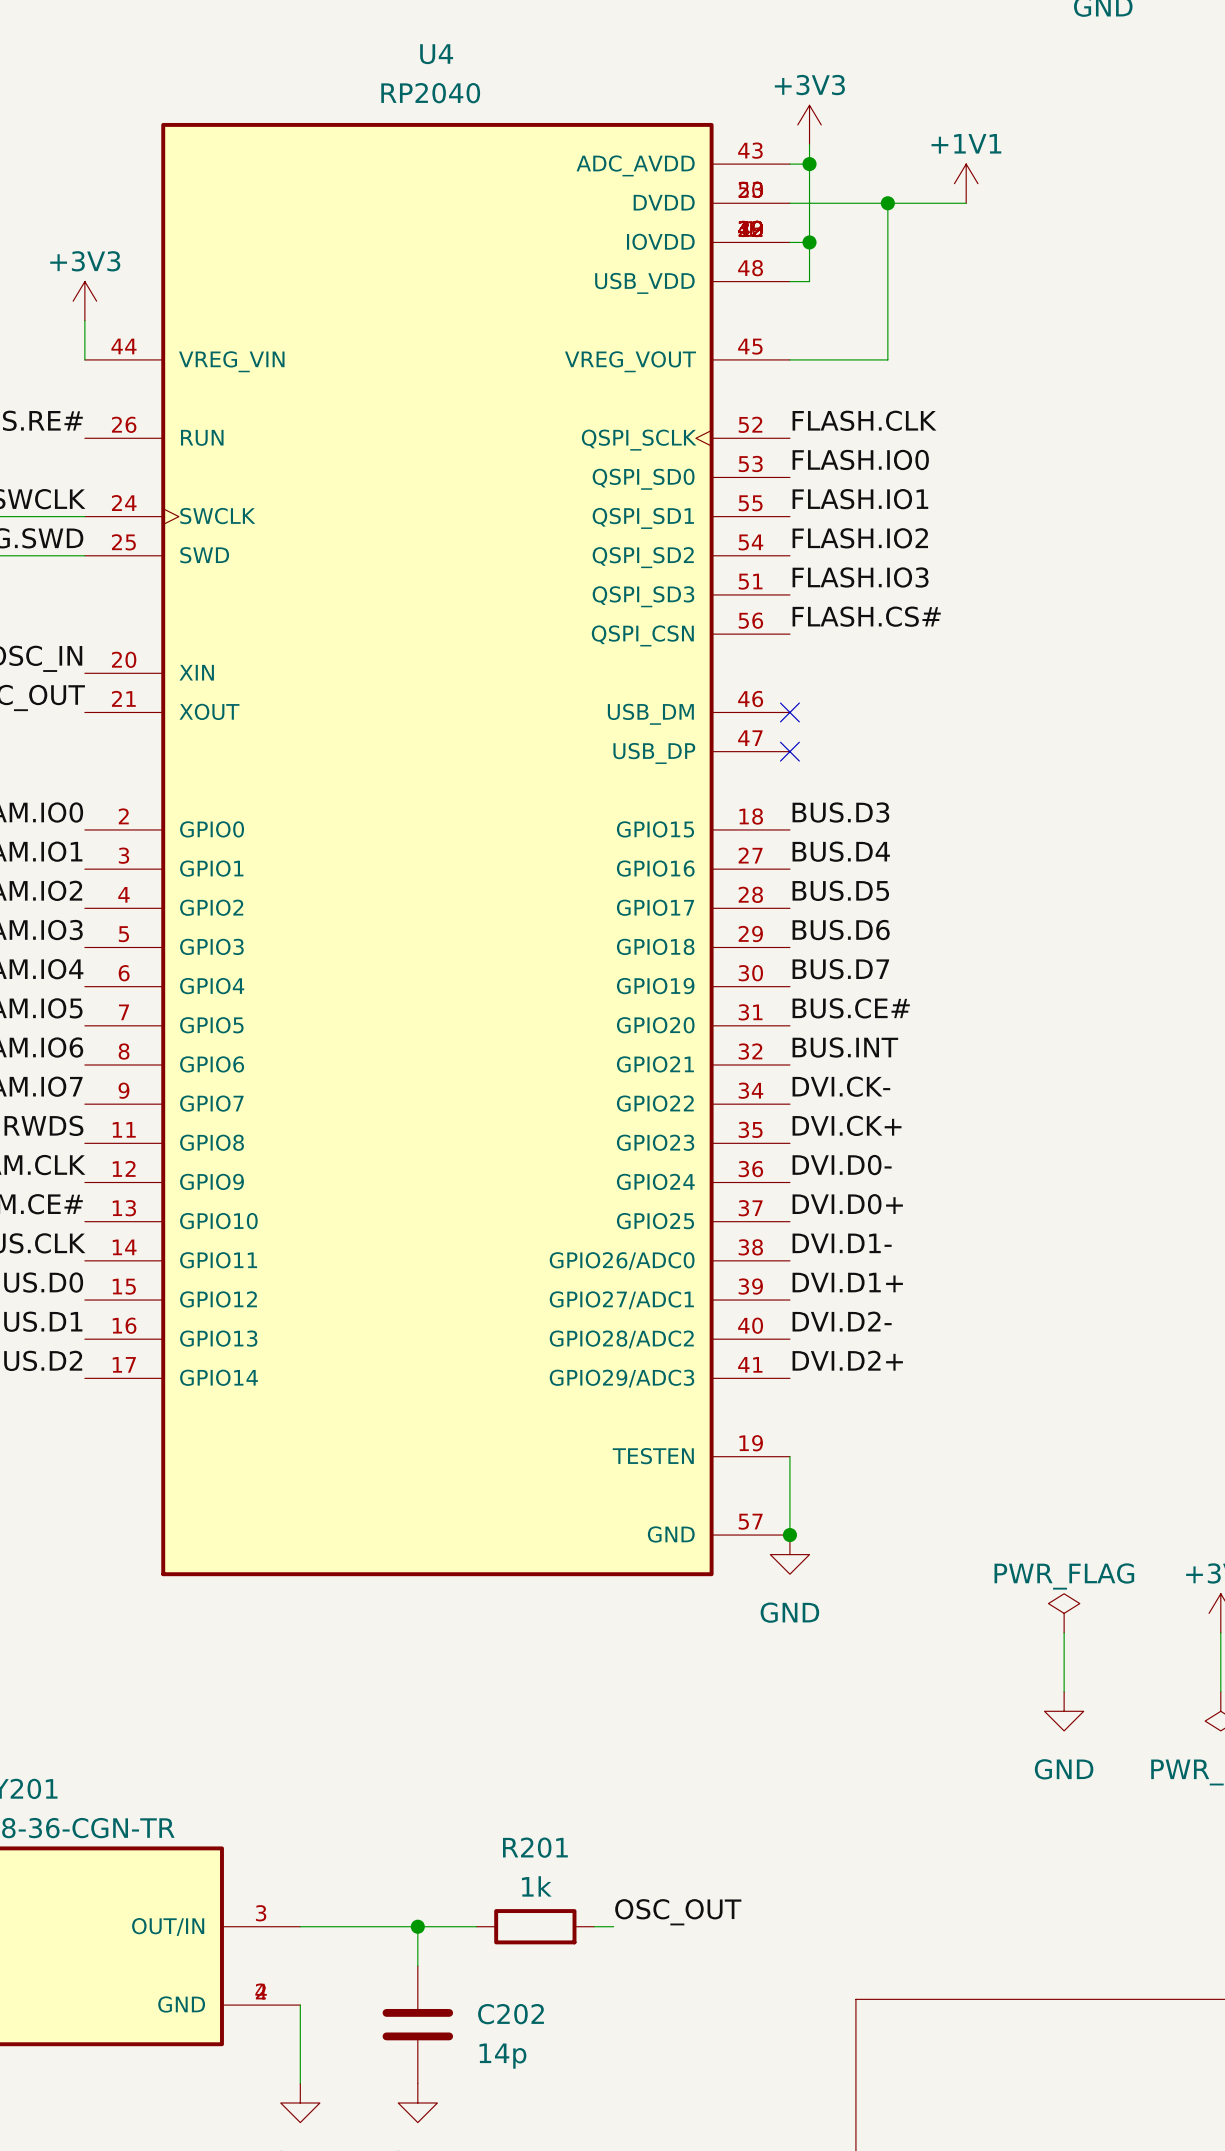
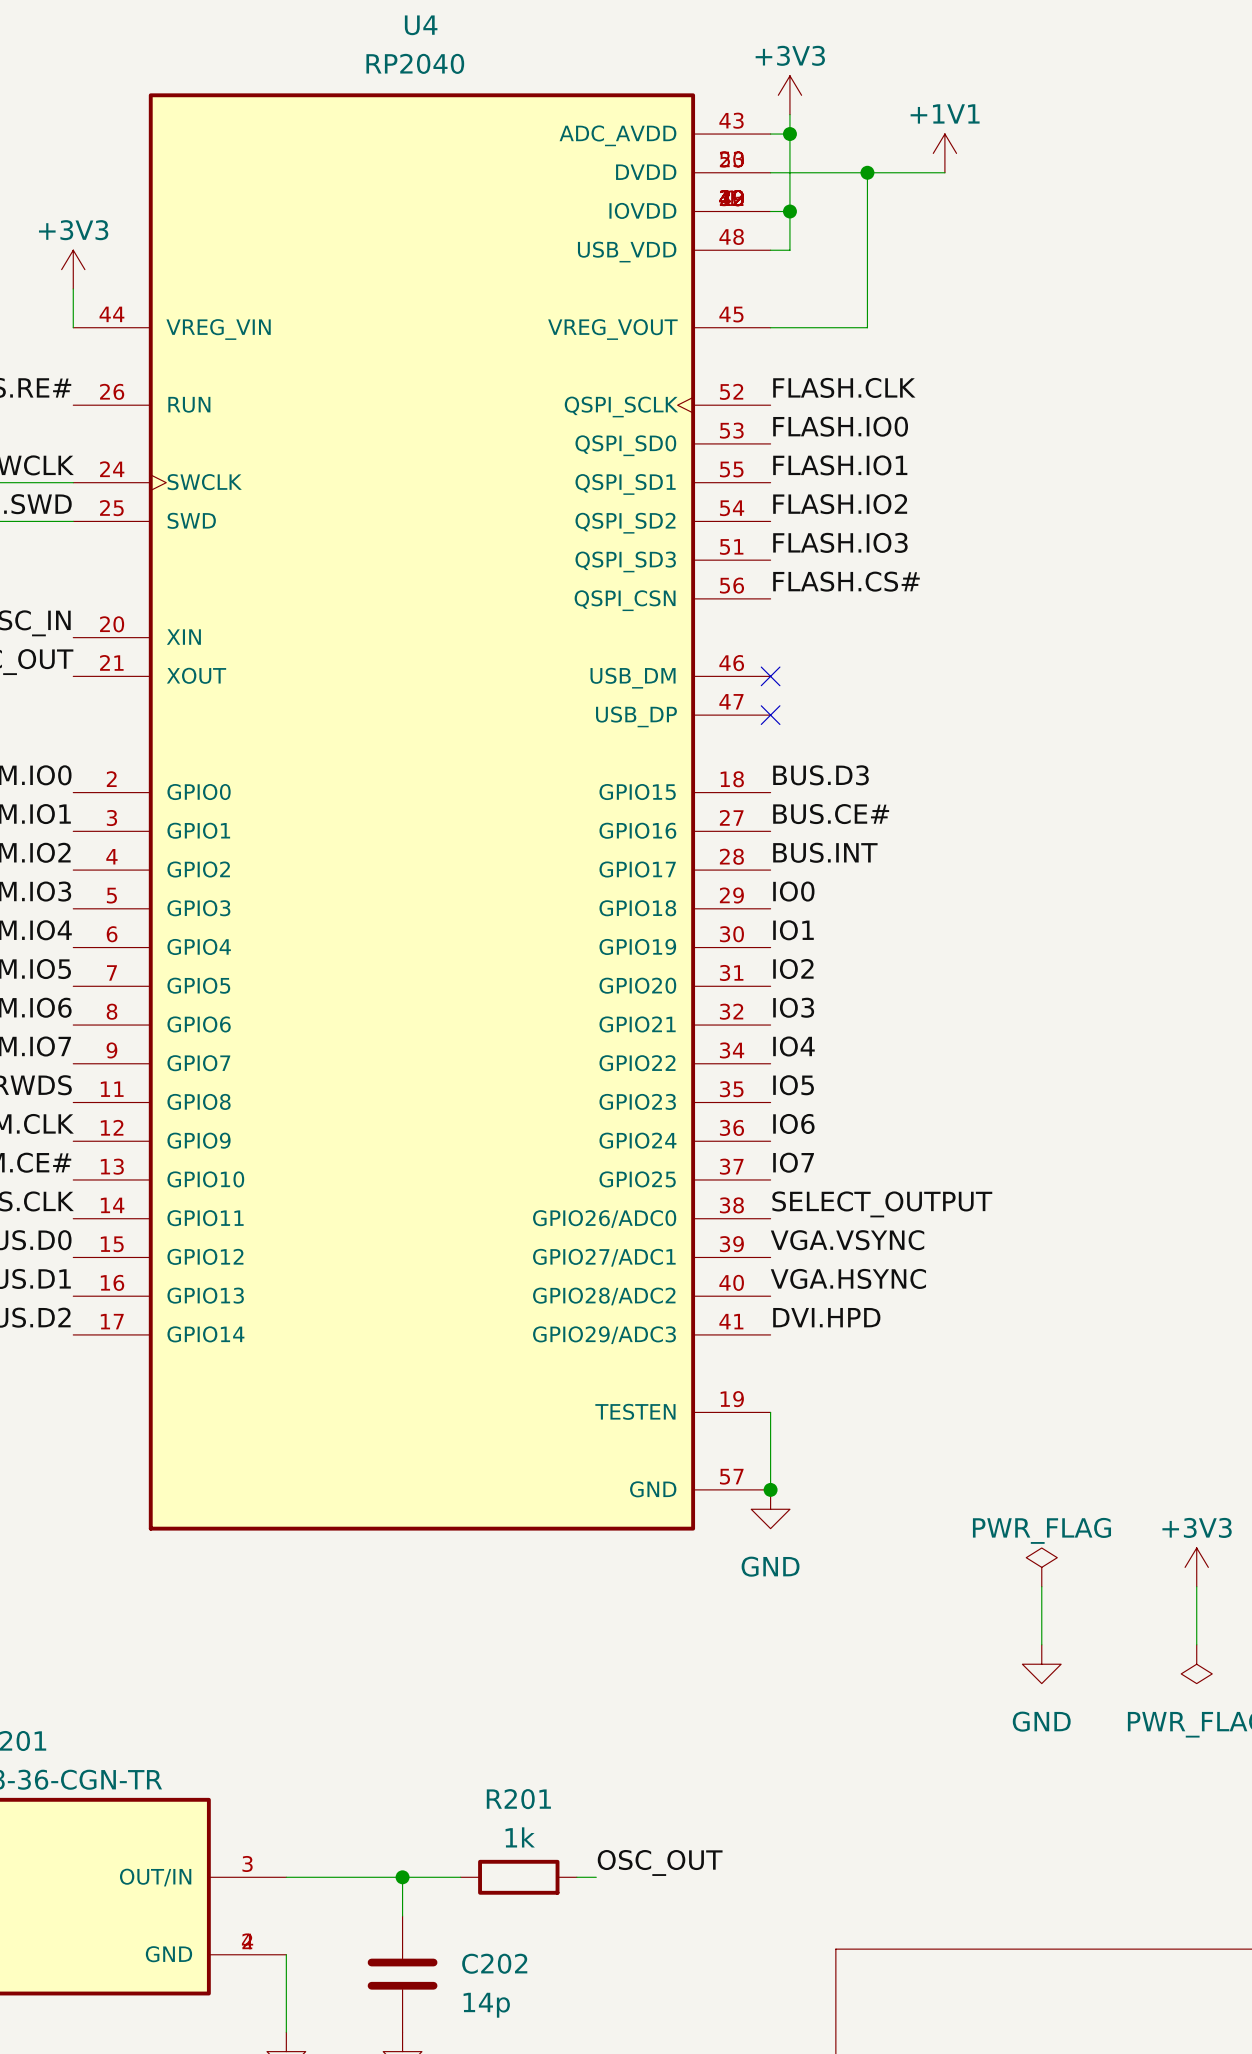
label: BUS.D4 (841, 851) -> BUS.CE# (831, 814)
label: BUS.D5 (840, 890) -> BUS.INT (825, 852)
label: BUS.D6 (841, 930) -> IO0 (793, 891)
label: BUS.D7 (840, 969) -> IO1 (793, 930)
label: BUS.CE# (851, 1008) -> IO2 (793, 969)
label: BUS.INT (845, 1047) -> IO3 (793, 1007)
label: DVI.CK- (841, 1086) -> IO4 (793, 1046)
label: DVI.CK+ (847, 1125) -> IO5 (793, 1085)
label: DVI.D0- (842, 1165) -> IO6 (793, 1123)
label: DVI.D0+ (847, 1204) -> IO7 (793, 1162)
label: DVI.D1- (842, 1243) -> SELECT_OUTPUT (882, 1204)
label: DVI.D1+ (847, 1282) -> VGA.VSYNC (847, 1240)
label: DVI.D2- (842, 1321) -> VGA.HSYNC (848, 1278)
label: DVI.D2+ (847, 1360) -> DVI.HPD (826, 1317)

